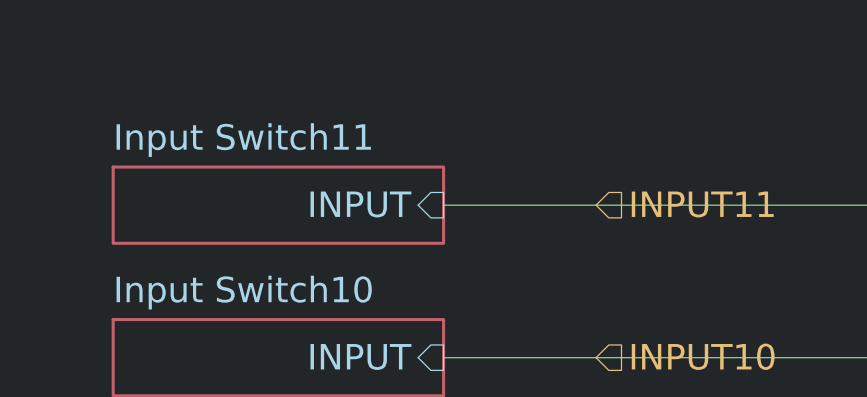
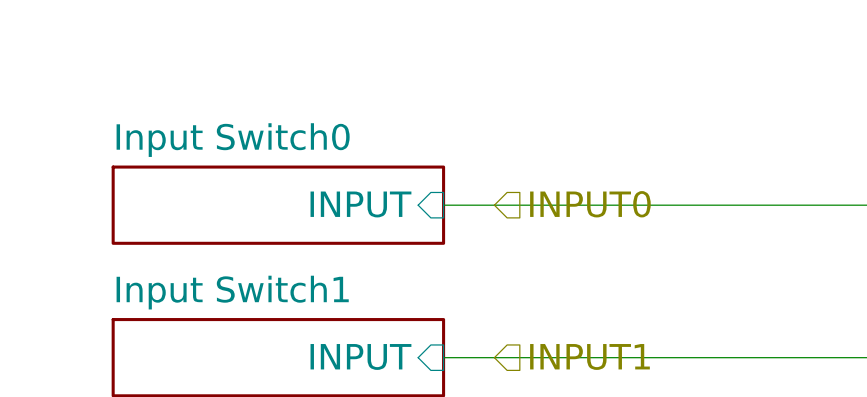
sheet Input Switch11 name: Input Switch11 (243, 140) -> Input Switch0 (233, 140)
hierarchical label: INPUT11 (702, 204) -> INPUT0 (590, 204)
sheet Input Switch10 name: Input Switch10 (244, 292) -> Input Switch1 (232, 292)
hierarchical label: INPUT10 (703, 356) -> INPUT1 (589, 356)

